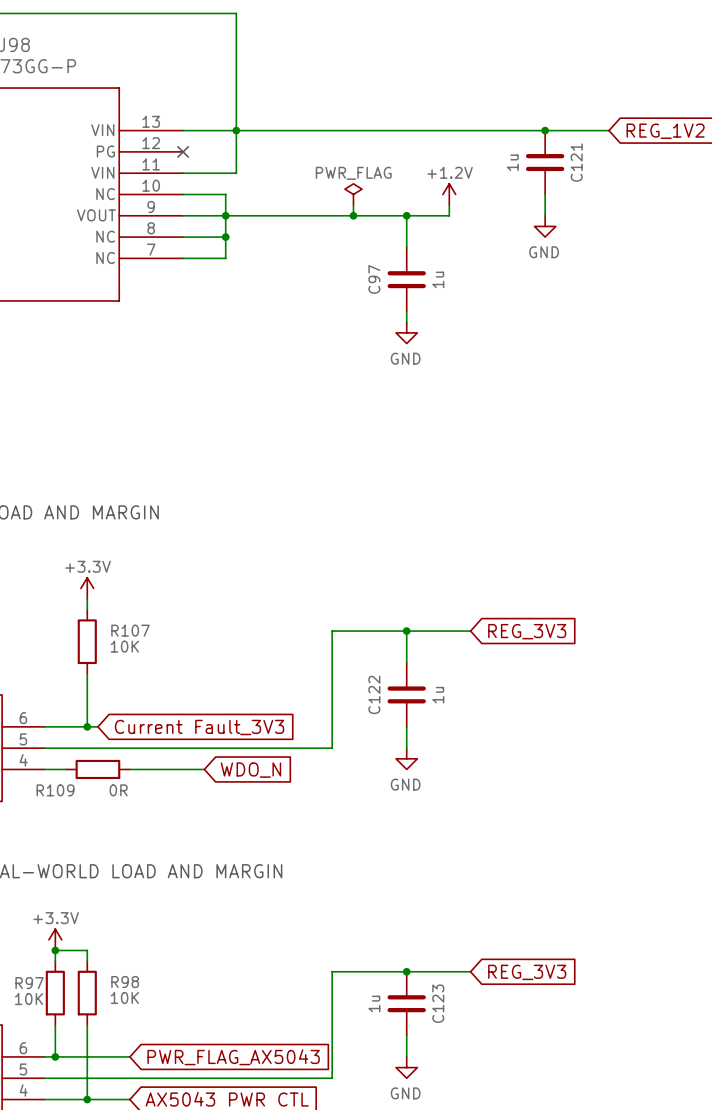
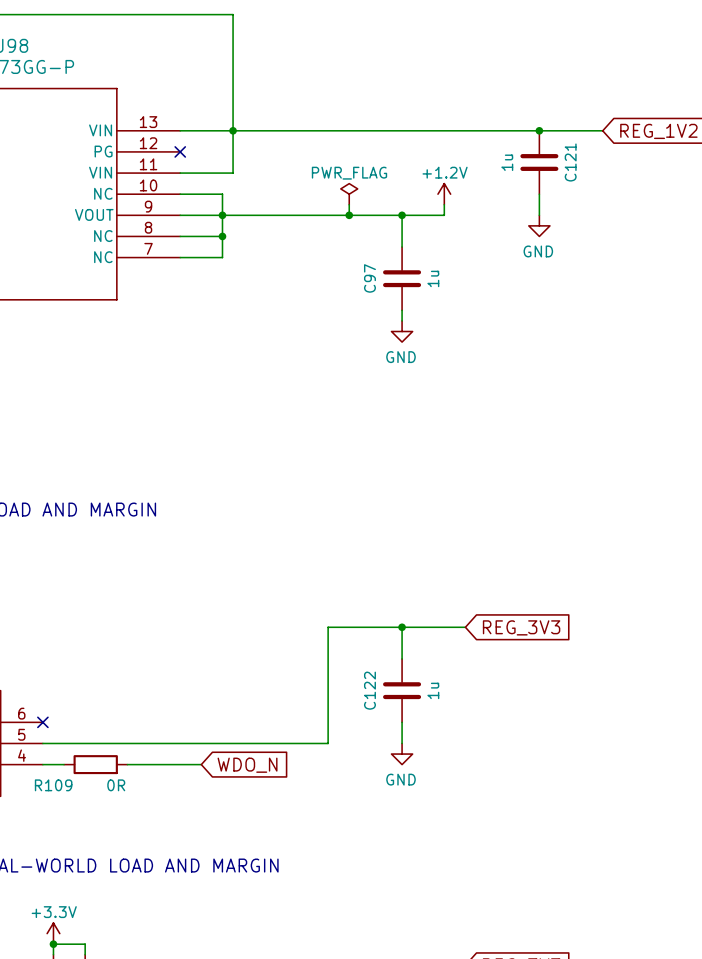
power symbol: +3.3V (87, 588) -> none
wire: (87, 599) (87, 609) -> none
R107: 10K (87, 641) -> none
wire: (87, 673) (87, 726) -> none
wire: (44, 726) (97, 726) -> none
no-connect mark: none -> (42, 722)
junction: (87, 726) -> none
global label: Current Fault_3V3 (199, 727) -> none

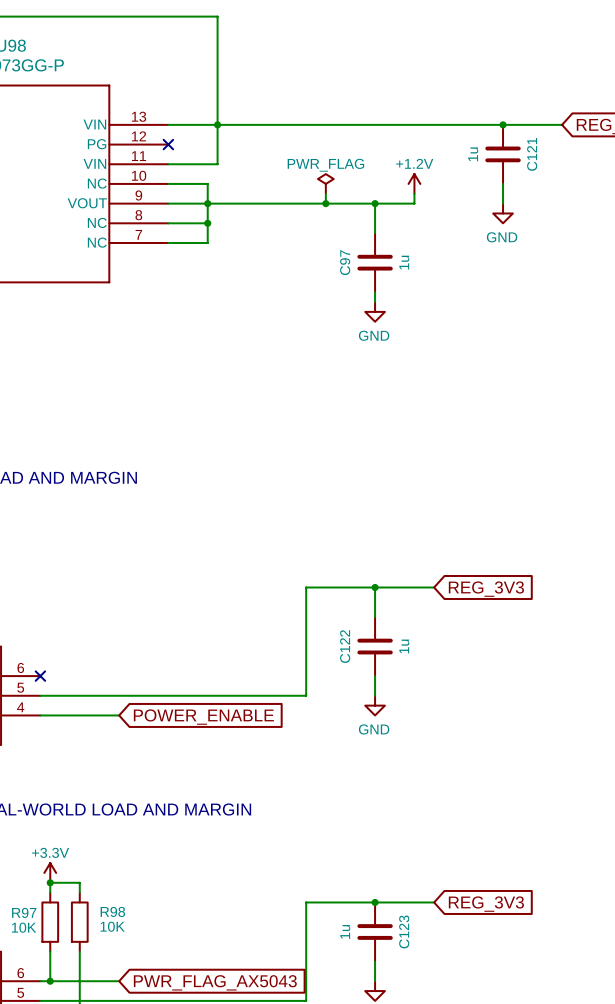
R109: 0R (95, 764) -> none
wire: (127, 764) (201, 764) -> (119, 715) (60, 715)
global label: none -> POWER_ENABLE (203, 717)
global label: WDO_N (247, 765) -> none

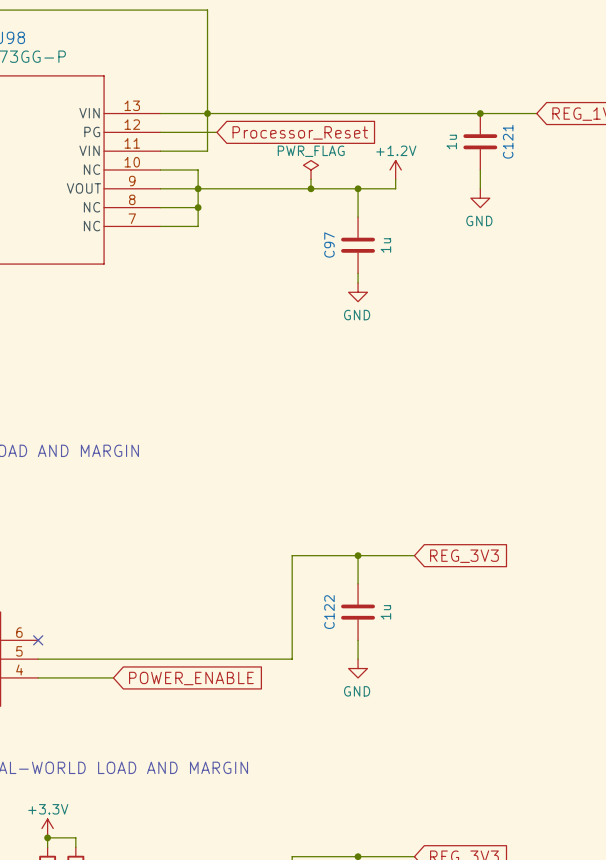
wire: none -> (160, 132) (216, 132)
no-connect mark: (168, 144) -> none
global label: none -> Processor_Reset (300, 132)

